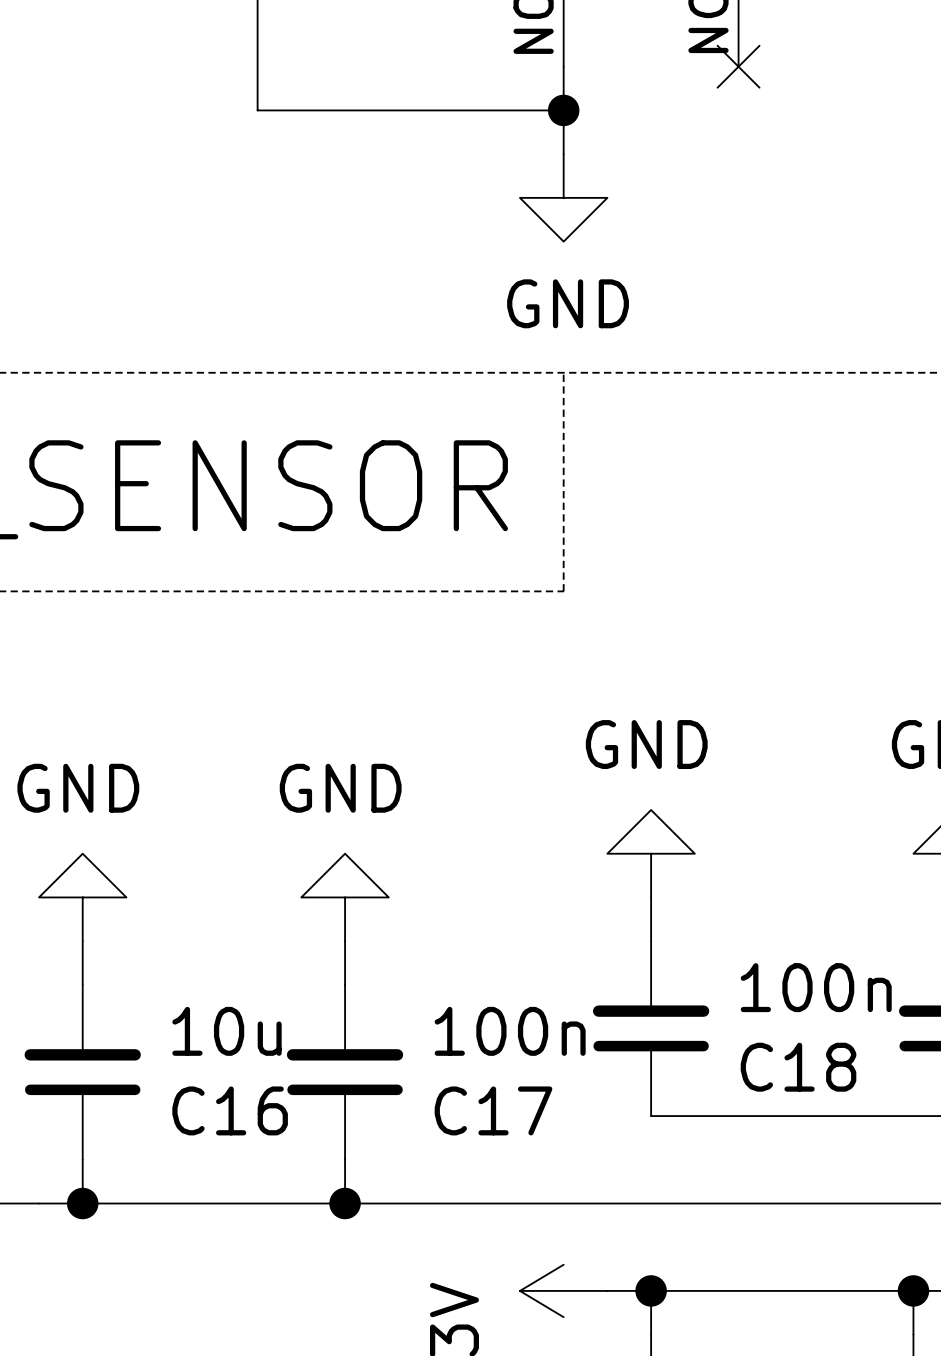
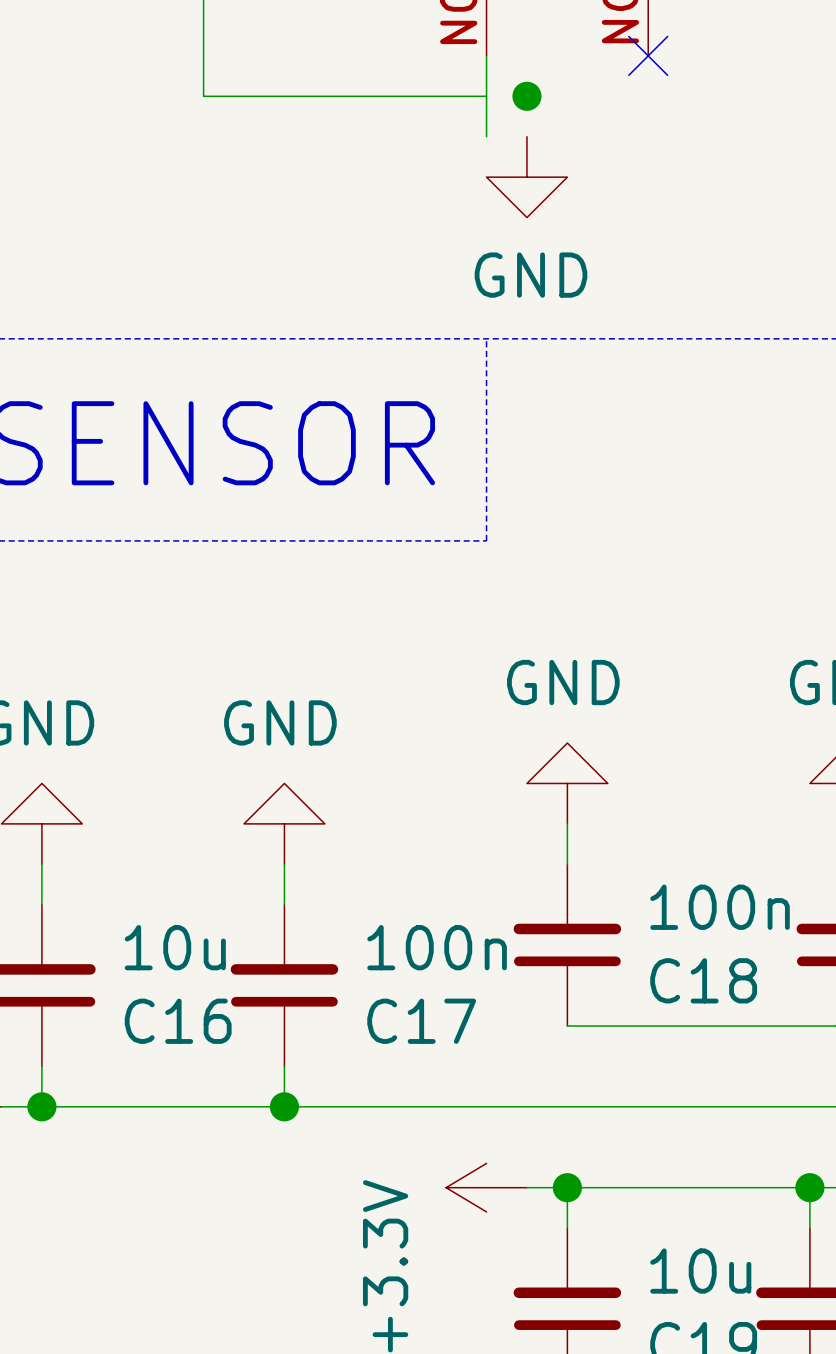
junction position: (563, 110) -> (526, 96)
power symbol position: GND (563, 197) -> GND (526, 177)

